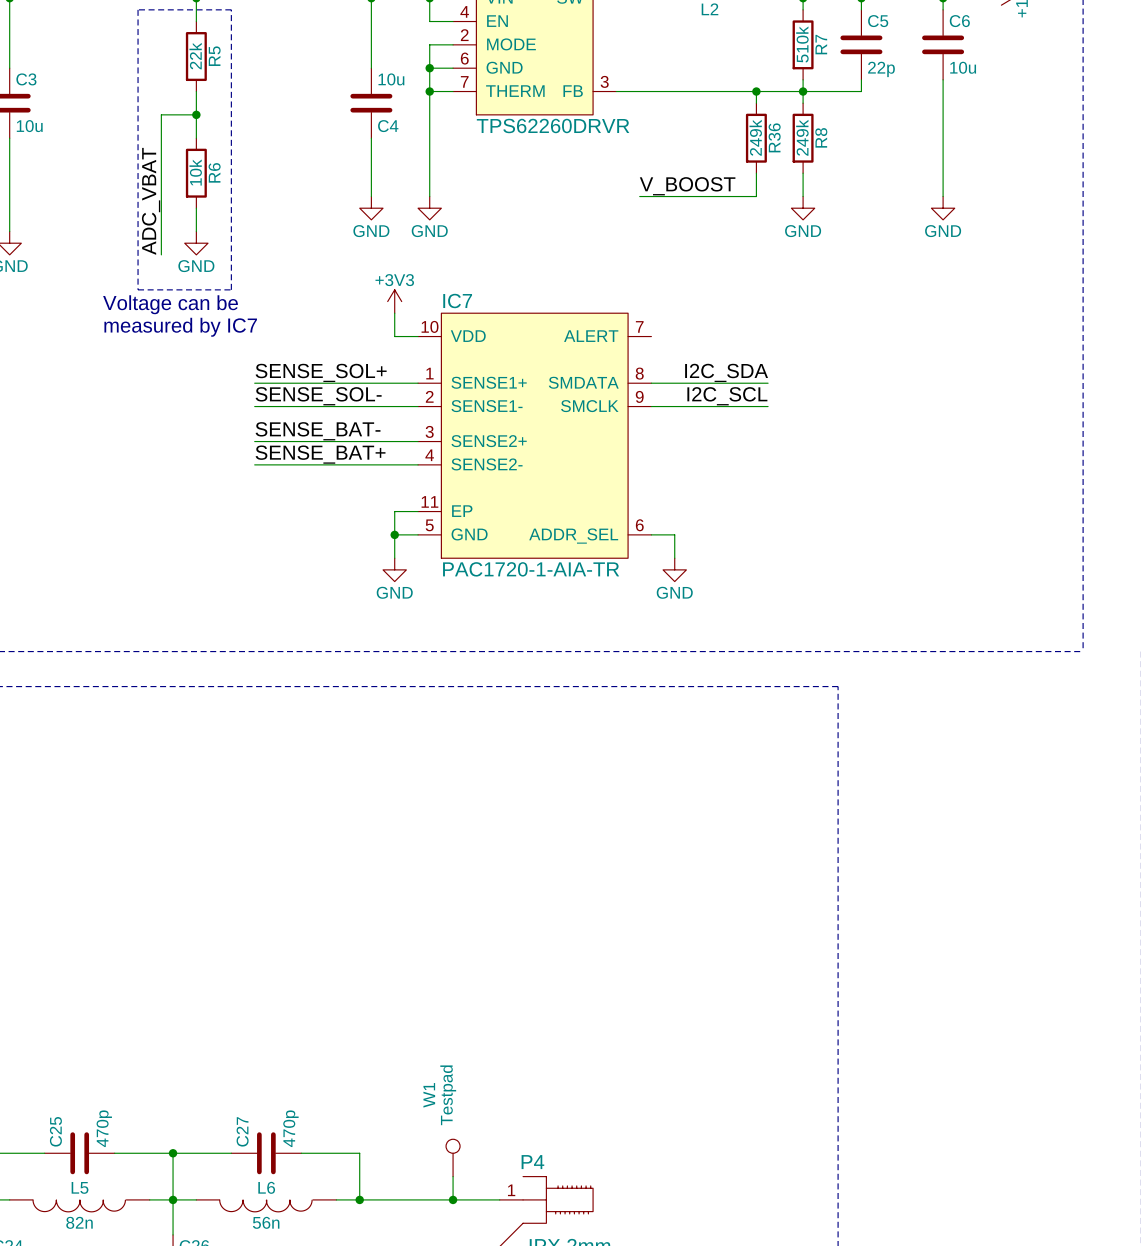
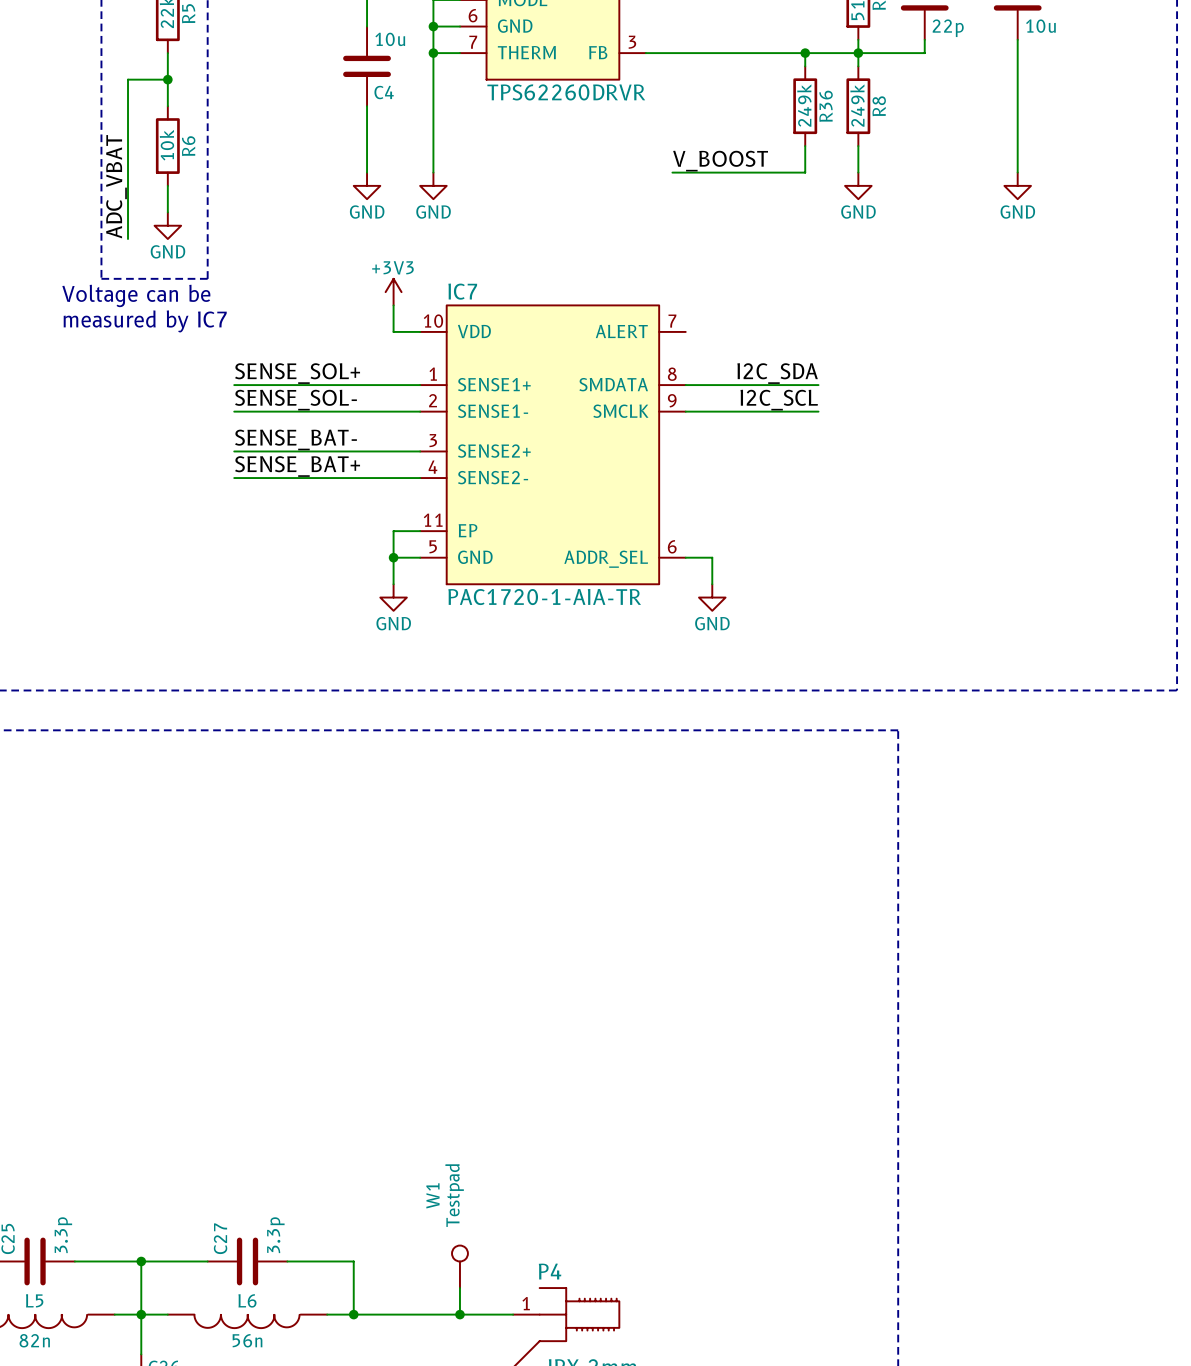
C25 value: 470p (104, 1128) -> 3.3p (63, 1235)
C27 value: 470p (290, 1128) -> 3.3p (275, 1235)

